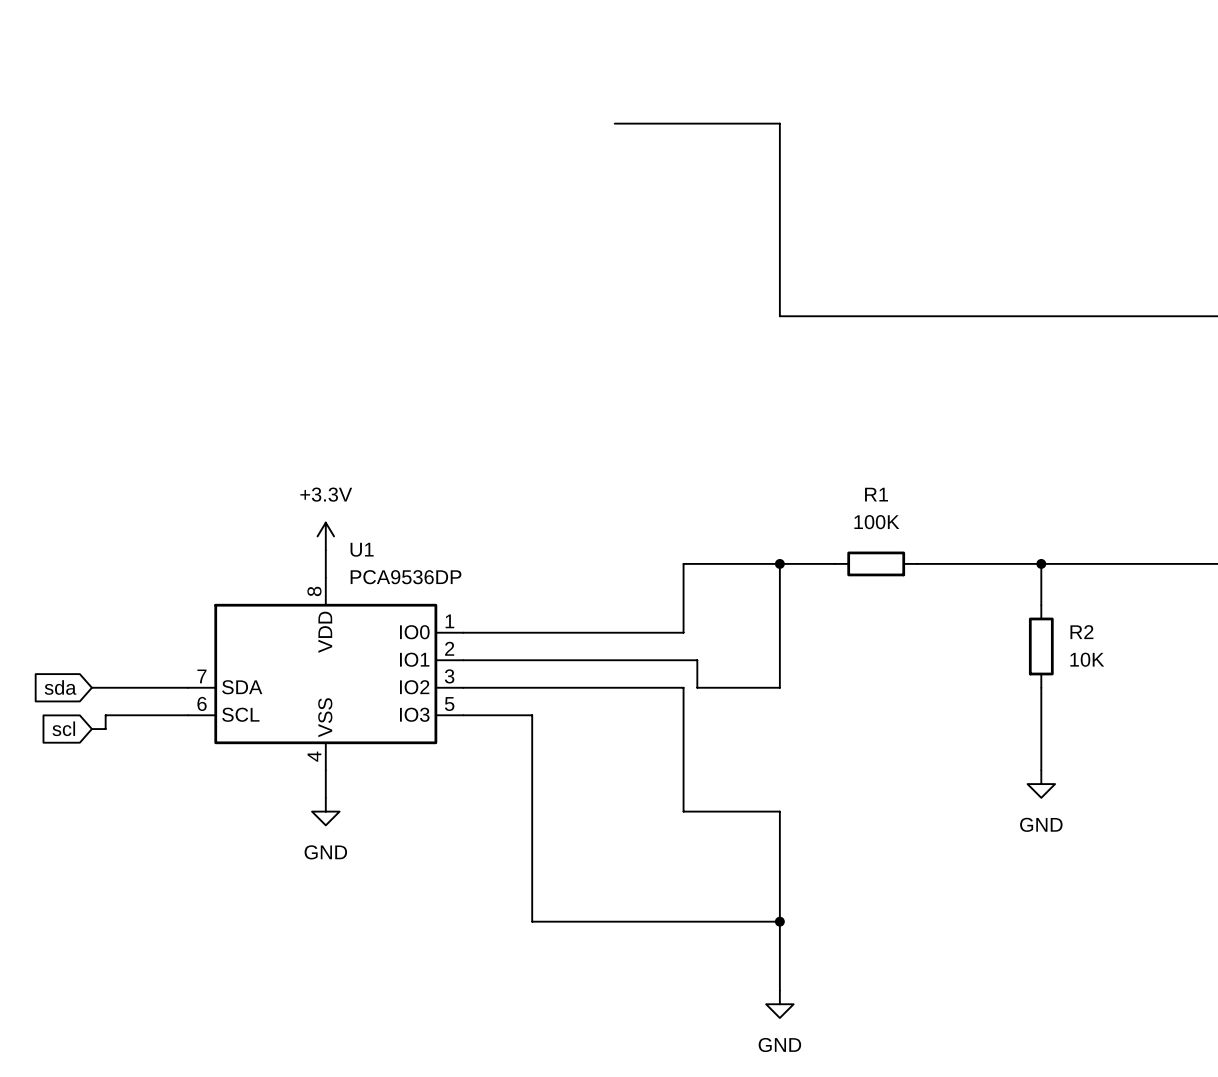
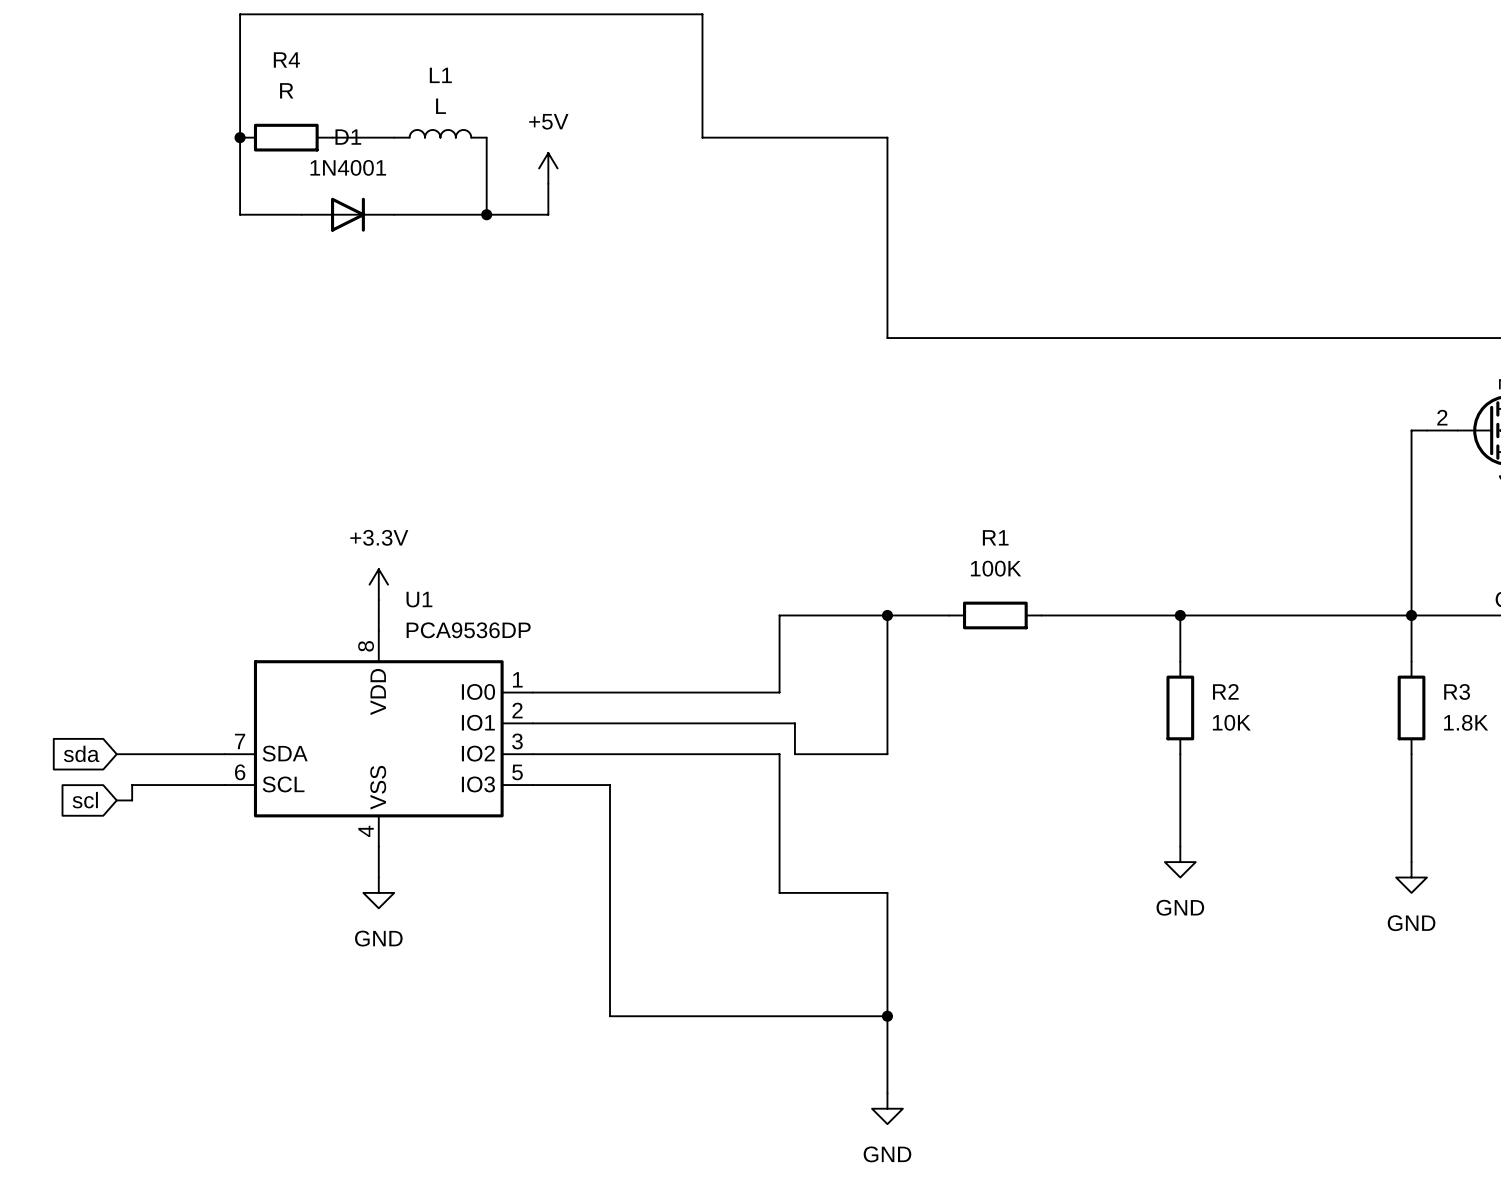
wire: (614, 123) (779, 123) (779, 137) -> (301, 214) (240, 214) (240, 14) (702, 14) (702, 137) (887, 137)
L1: none -> L (440, 133)
junction: none -> (240, 137)
R4: none -> R (286, 137)
wire: none -> (332, 137) (394, 137)
wire: none -> (486, 137) (486, 214)
power symbol: none -> +5V (548, 168)
wire: none -> (548, 183) (548, 214) (394, 214)
D1: none -> 1N4001 (347, 214)
junction: none -> (486, 214)

